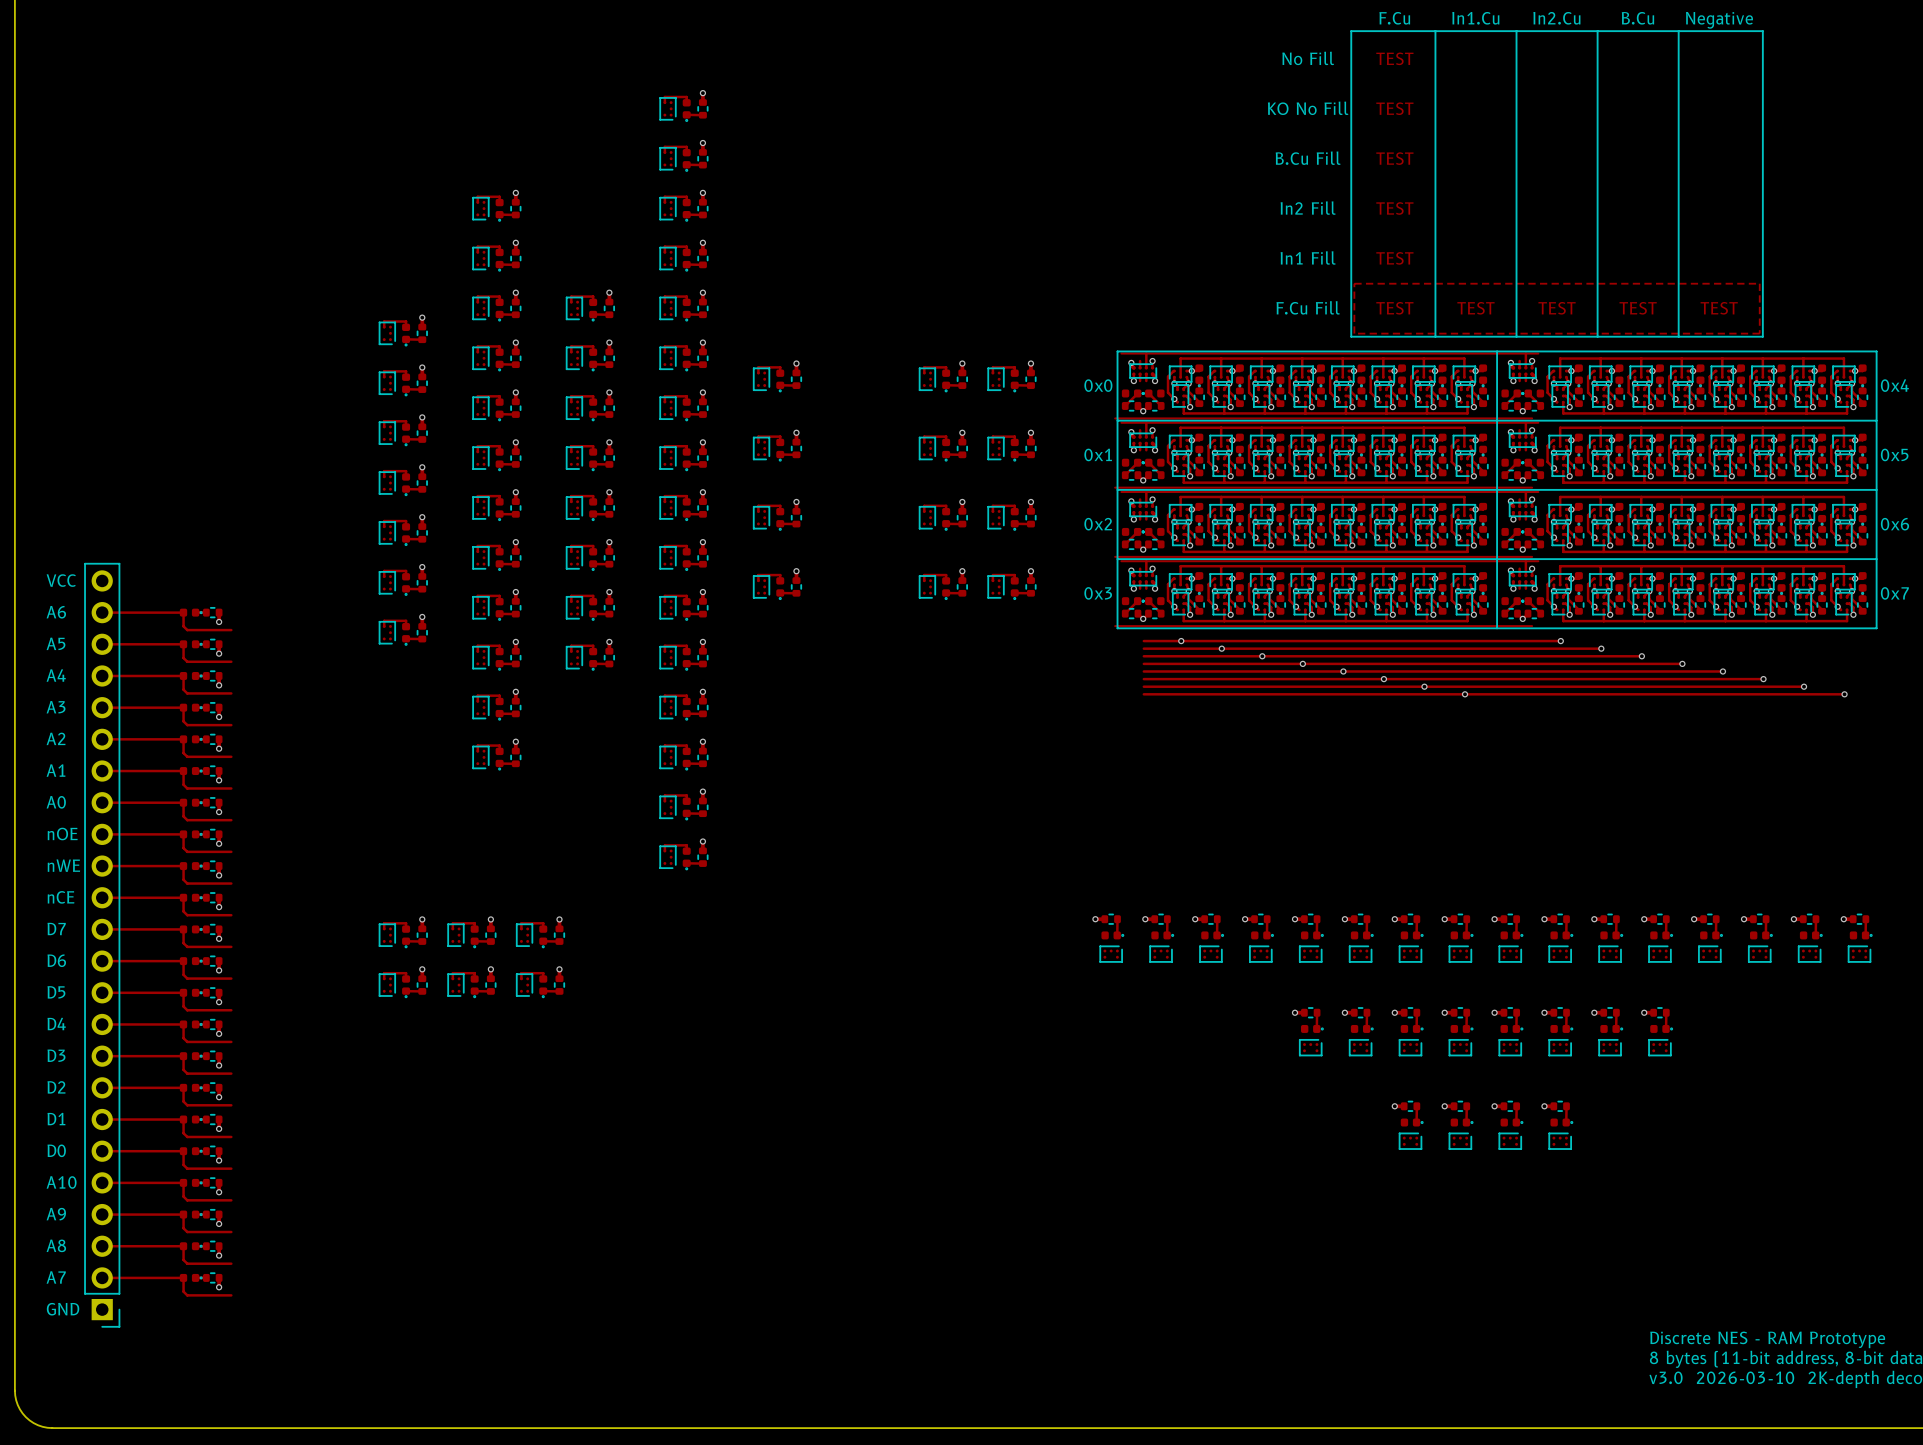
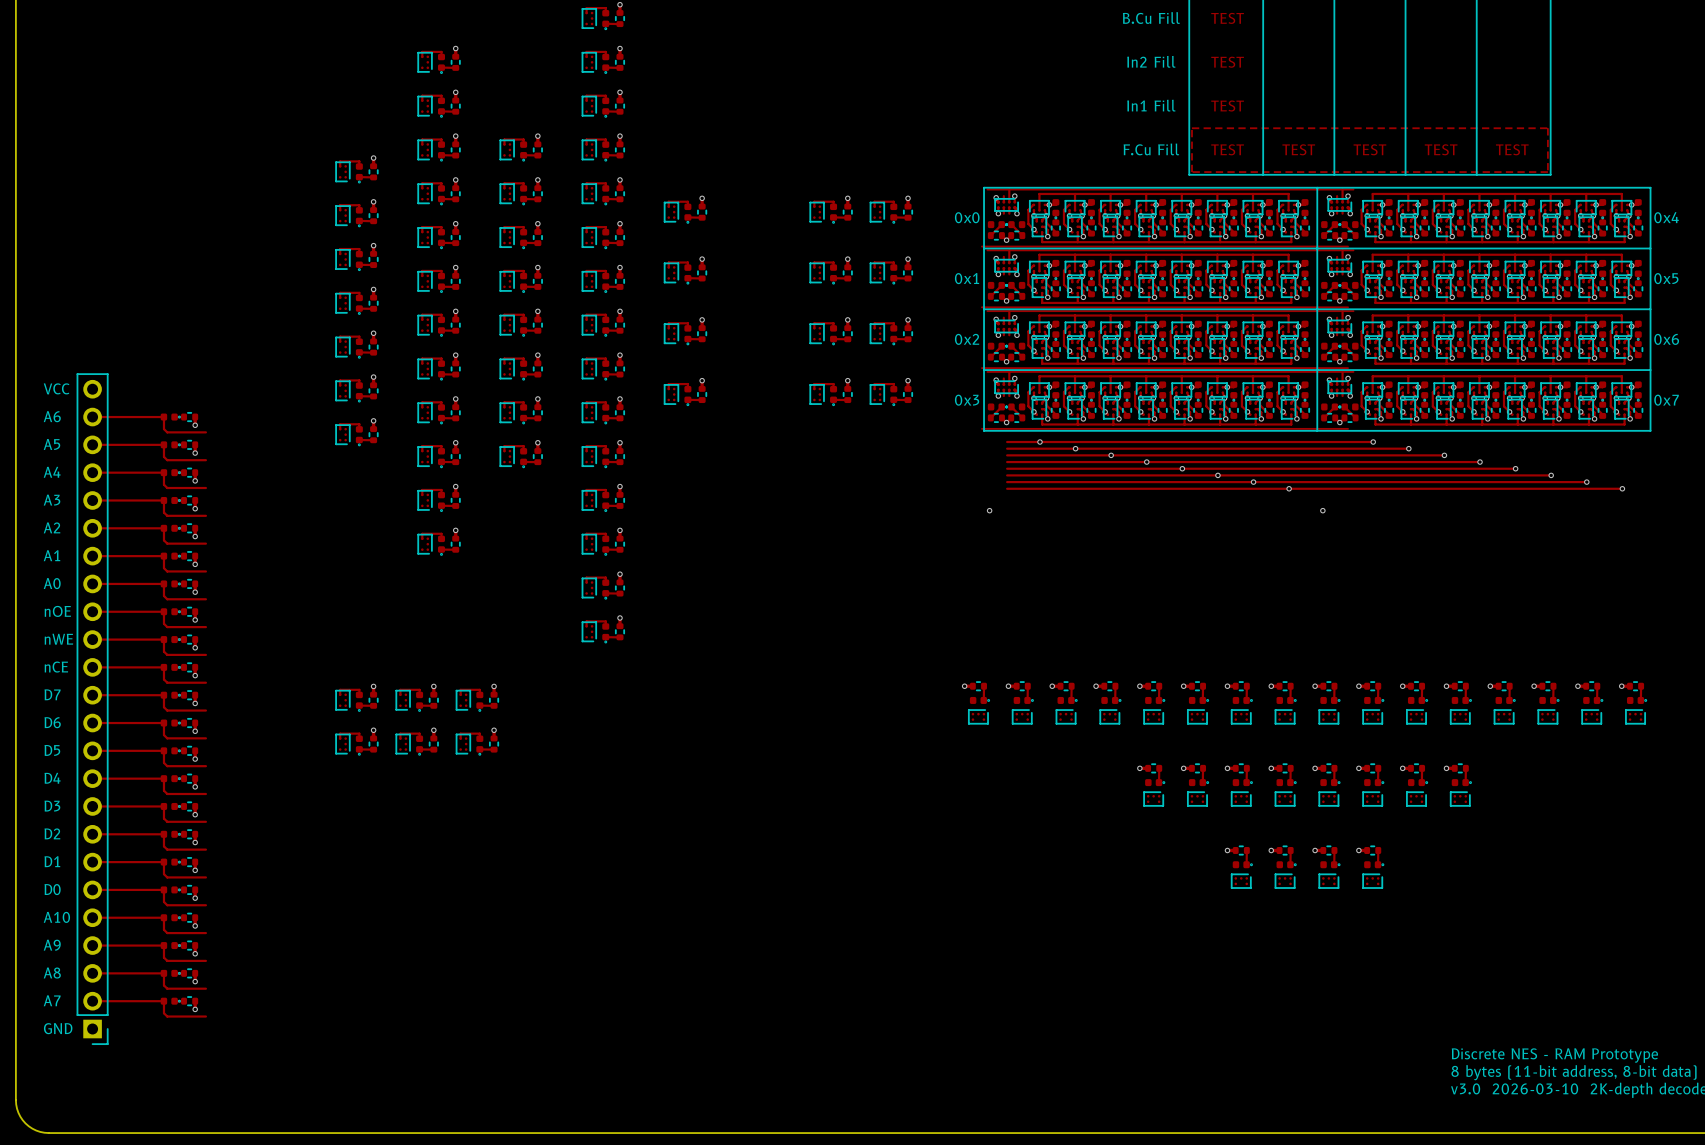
via: none -> (989, 510)
via: none -> (1322, 510)

